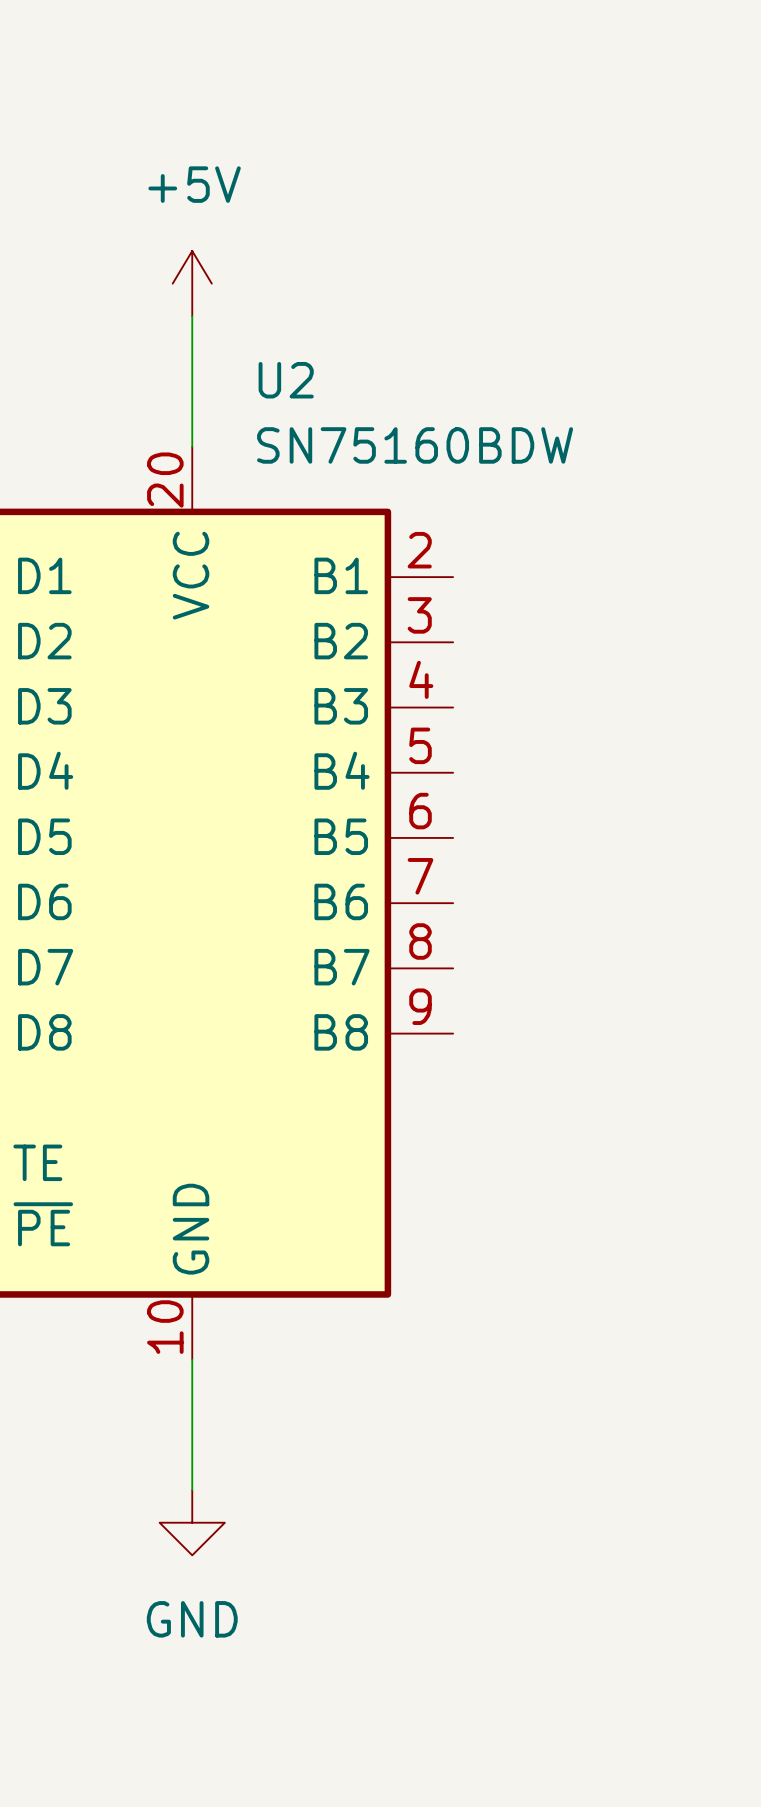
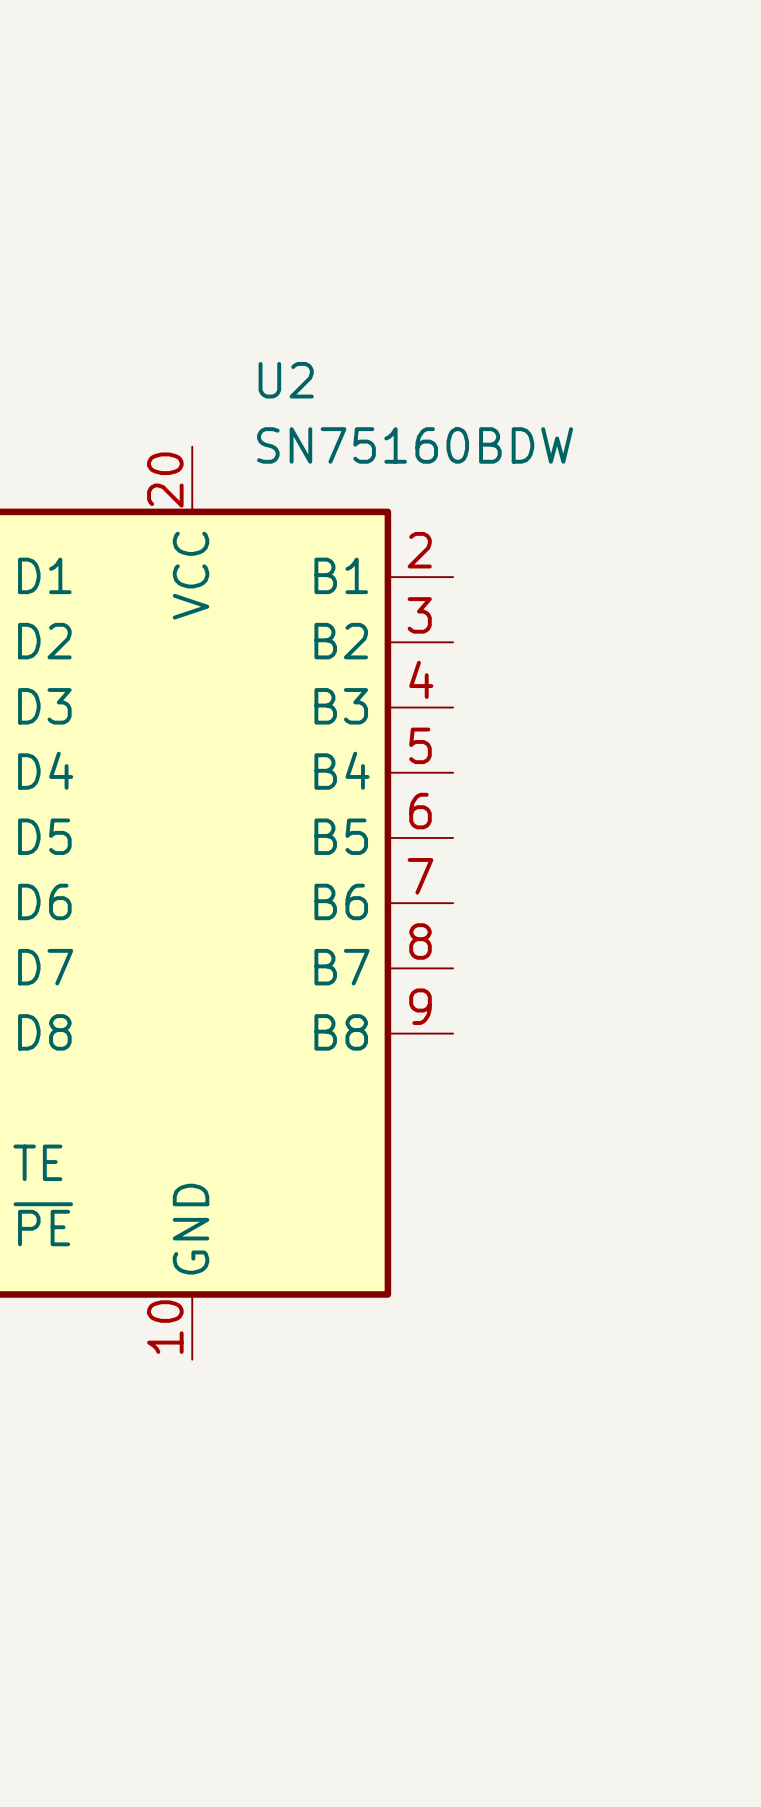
power symbol: +5V (192, 283) -> none
wire: (192, 316) (192, 446) -> none
wire: (192, 1359) (192, 1490) -> none
power symbol: GND (192, 1522) -> none

